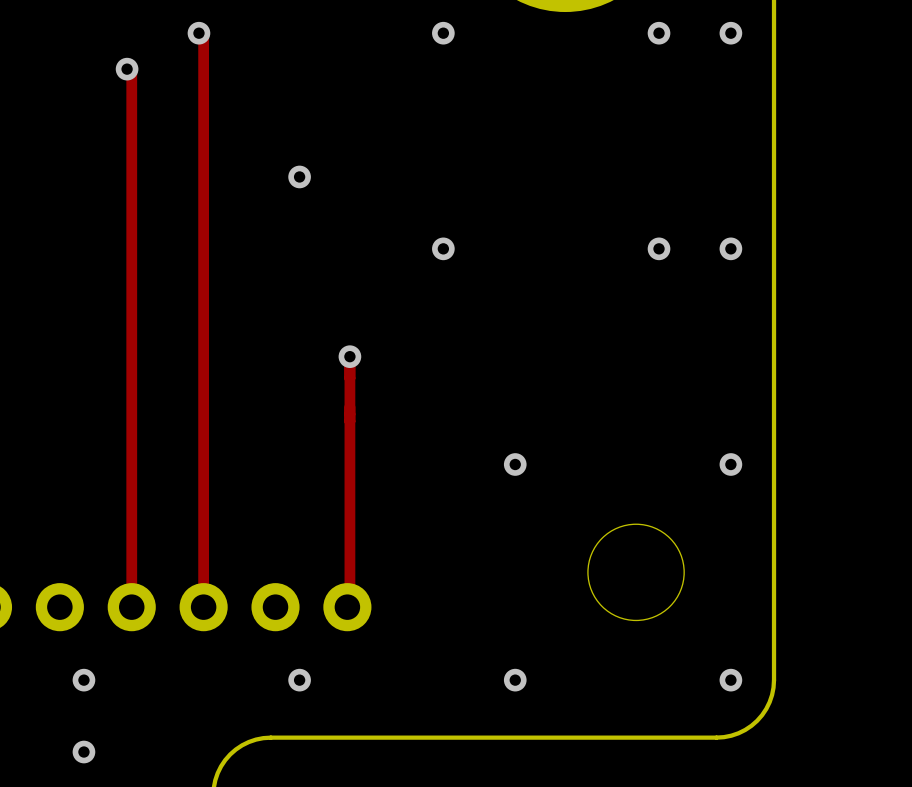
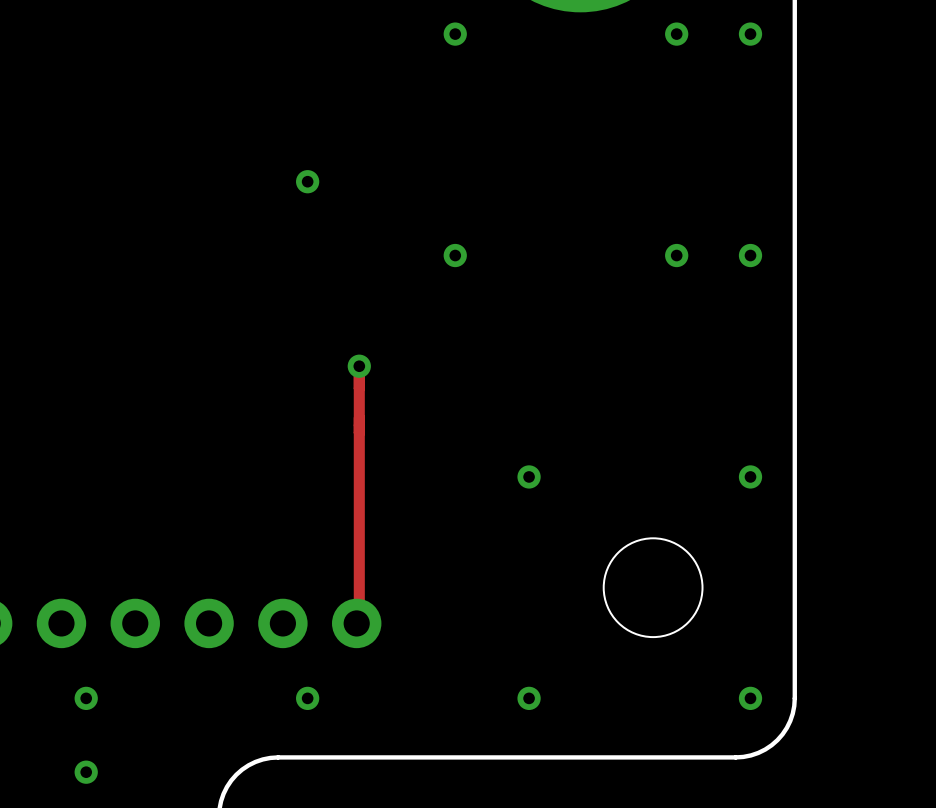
track: (198, 33) (203, 37) (203, 607) -> none
via: (198, 33) -> none
track: (127, 69) (131, 73) (131, 607) -> none
via: (127, 69) -> none

